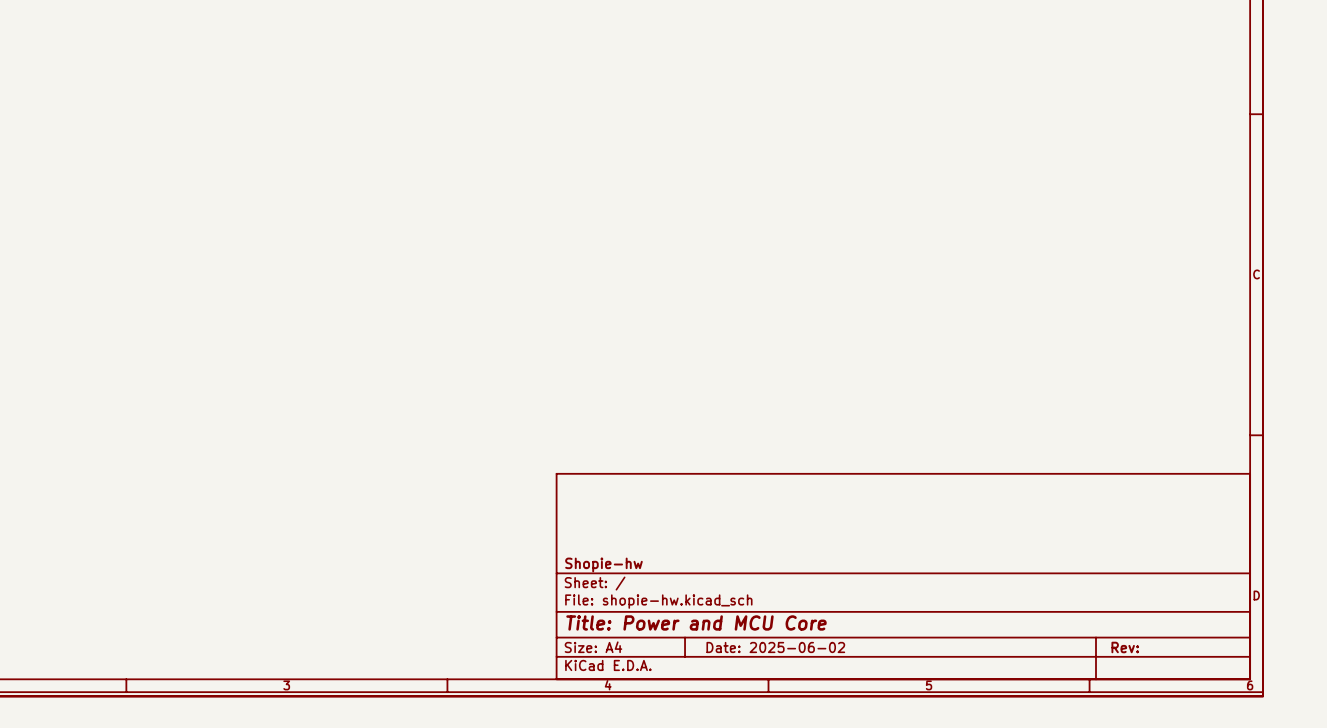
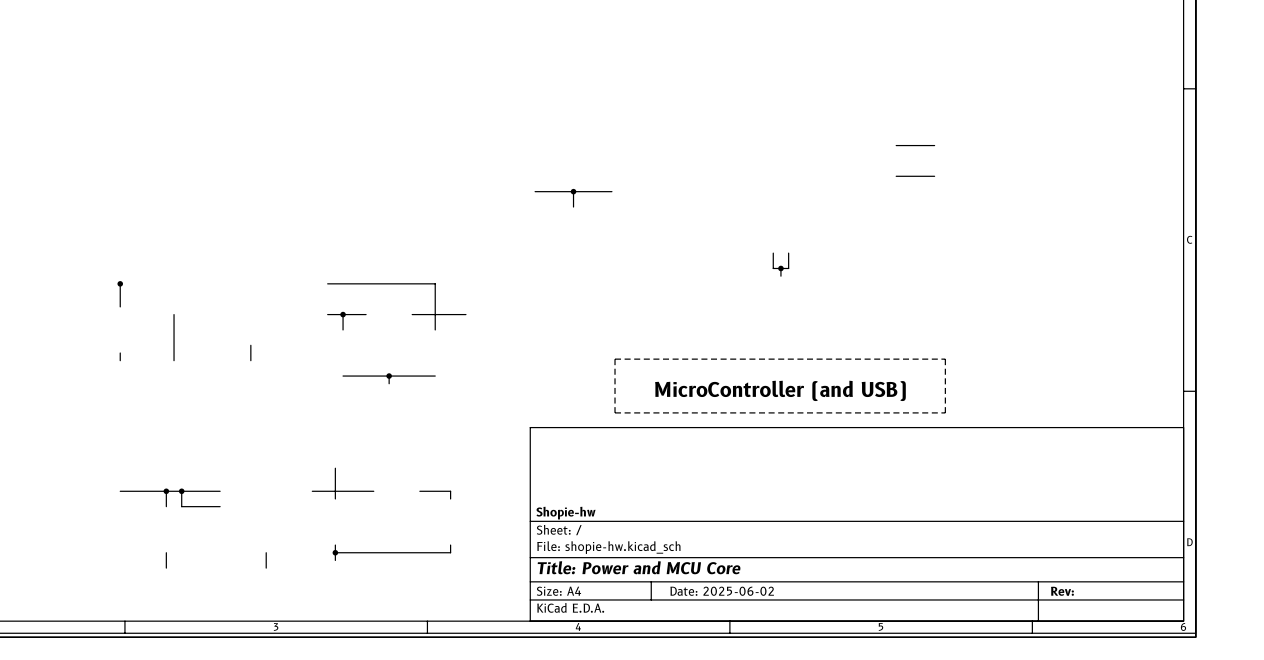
wire: none -> (896, 145) (934, 145)
wire: none -> (896, 176) (934, 176)
wire: none -> (535, 191) (611, 191)
wire: none -> (573, 191) (573, 207)
junction: none -> (573, 191)
wire: none -> (773, 253) (773, 268) (788, 268) (788, 253)
wire: none -> (780, 268) (780, 276)
junction: none -> (780, 268)
wire: none -> (120, 283) (120, 306)
junction: none -> (120, 283)
wire: none -> (327, 283) (435, 283) (435, 329)
wire: none -> (174, 314) (174, 360)
wire: none -> (327, 314) (366, 314)
wire: none -> (343, 314) (343, 329)
junction: none -> (343, 314)
wire: none -> (412, 314) (465, 314)
wire: none -> (250, 345) (250, 360)
wire: none -> (120, 352) (120, 360)
line: none -> (615, 359) (945, 359) (945, 412) (615, 412) (615, 359)
wire: none -> (343, 376) (435, 376)
wire: none -> (389, 376) (389, 383)
junction: none -> (389, 376)
text: none -> MicroController (and USB) (780, 390)
wire: none -> (335, 468) (335, 498)
wire: none -> (120, 491) (220, 491)
wire: none -> (166, 491) (166, 506)
junction: none -> (166, 491)
wire: none -> (181, 491) (181, 506) (220, 506)
junction: none -> (181, 491)
wire: none -> (312, 491) (373, 491)
wire: none -> (419, 491) (450, 491) (450, 498)
wire: none -> (335, 545) (335, 560)
wire: none -> (450, 545) (450, 552) (335, 552)
wire: none -> (166, 552) (166, 568)
wire: none -> (266, 552) (266, 568)
junction: none -> (335, 552)

